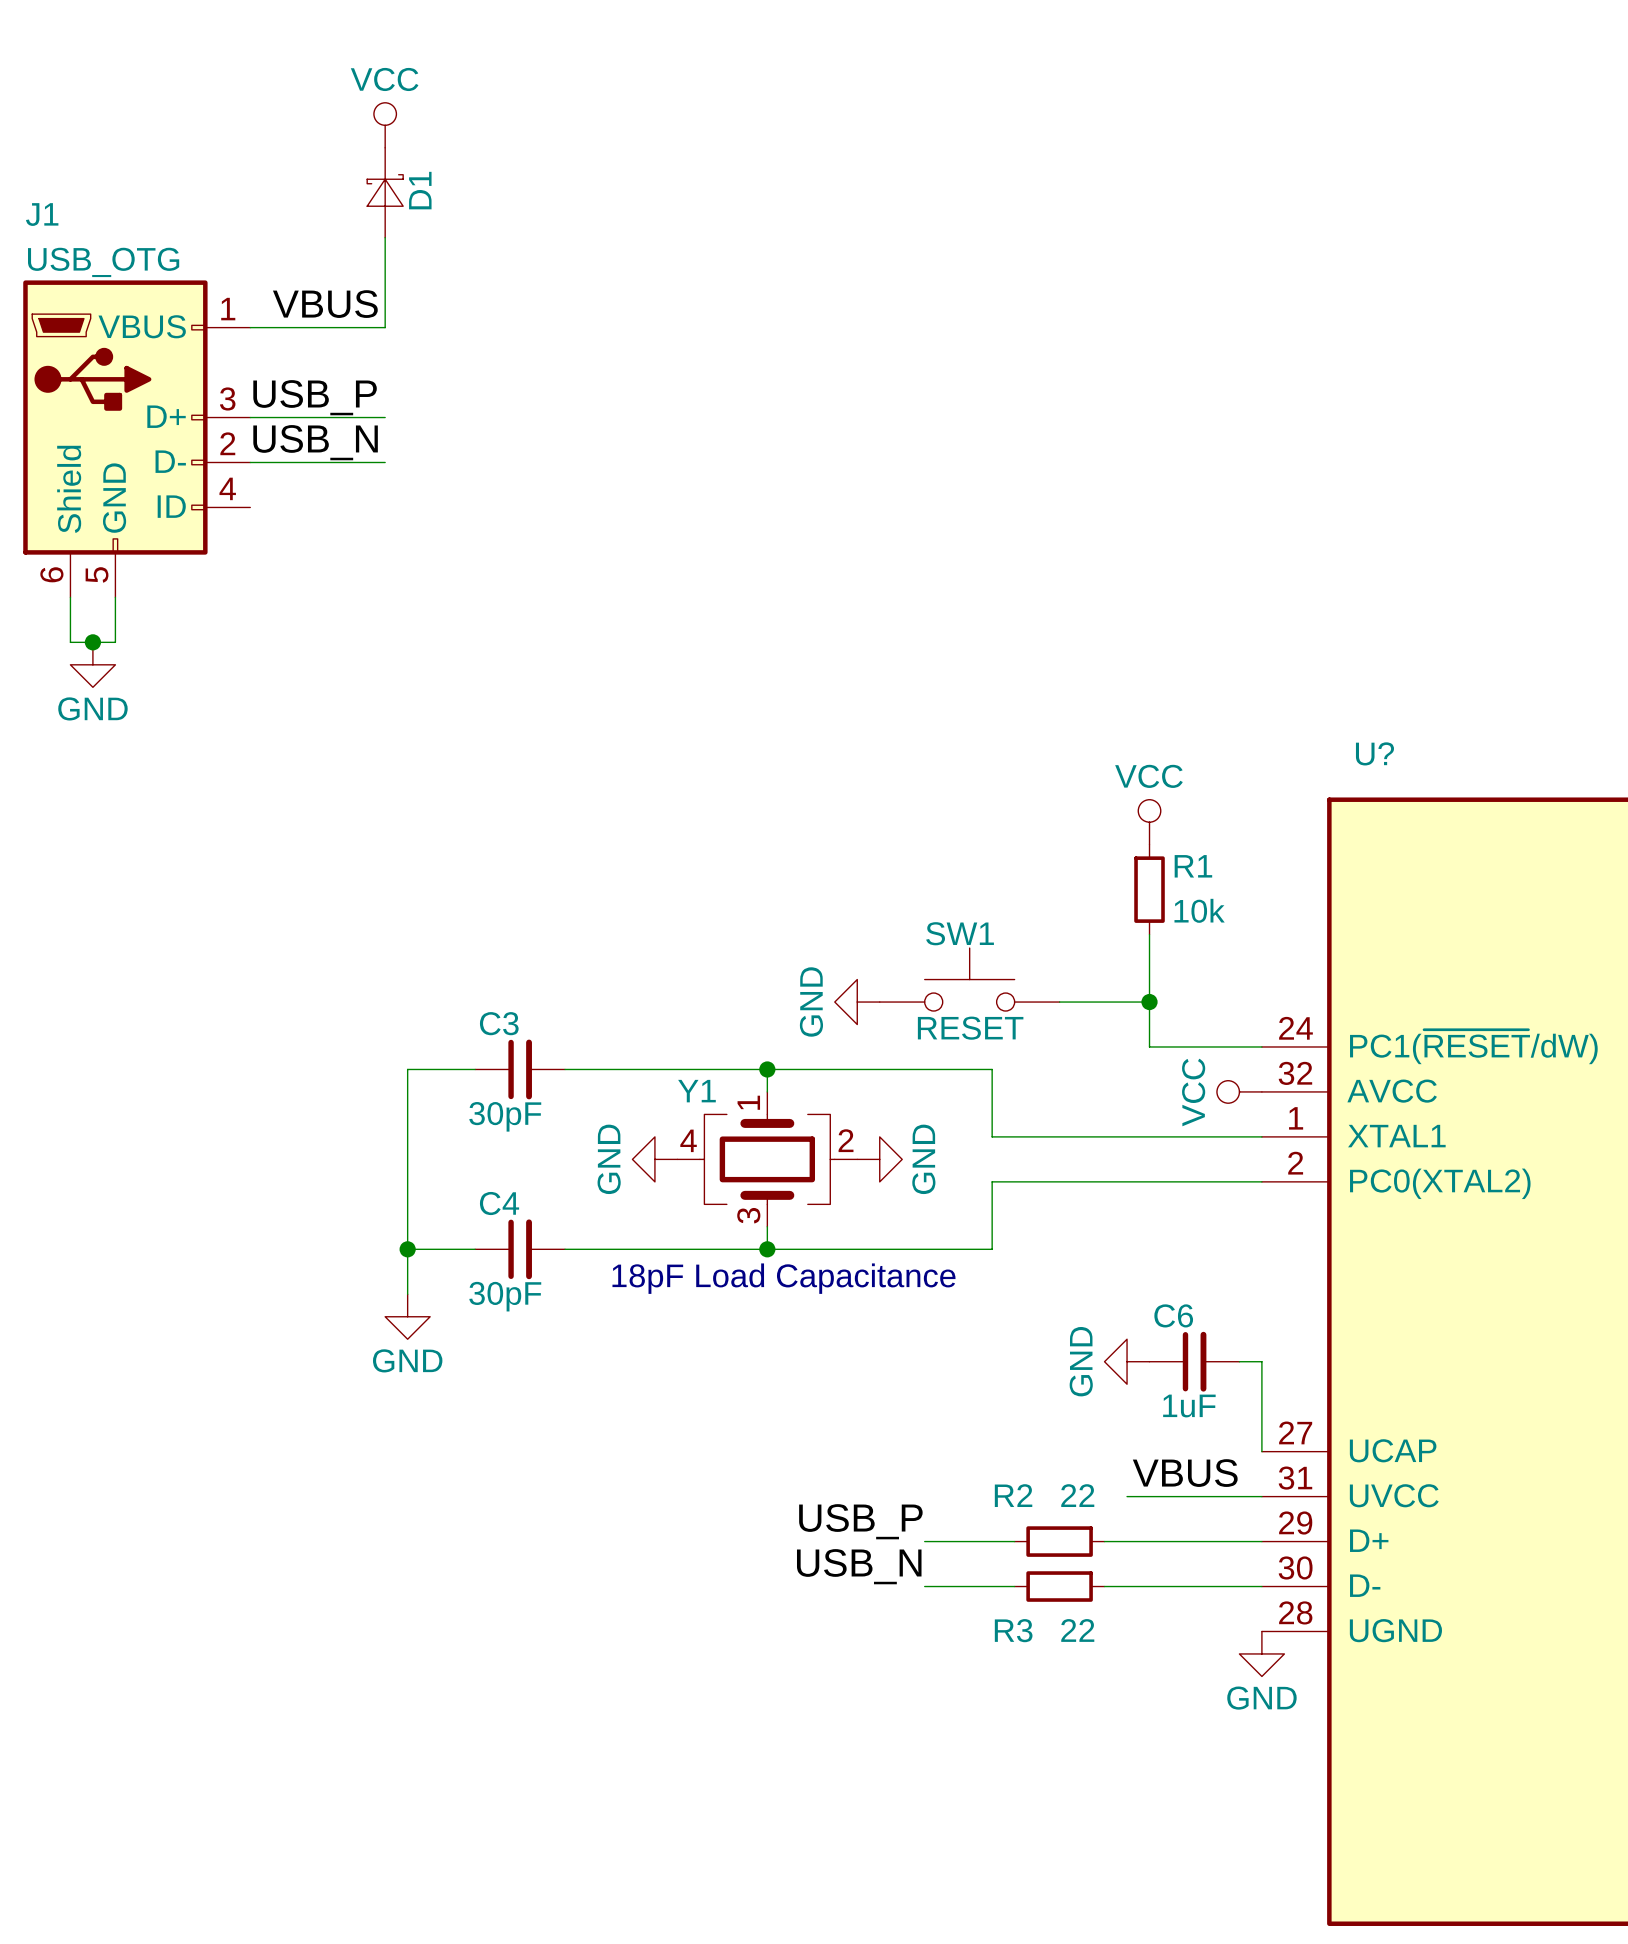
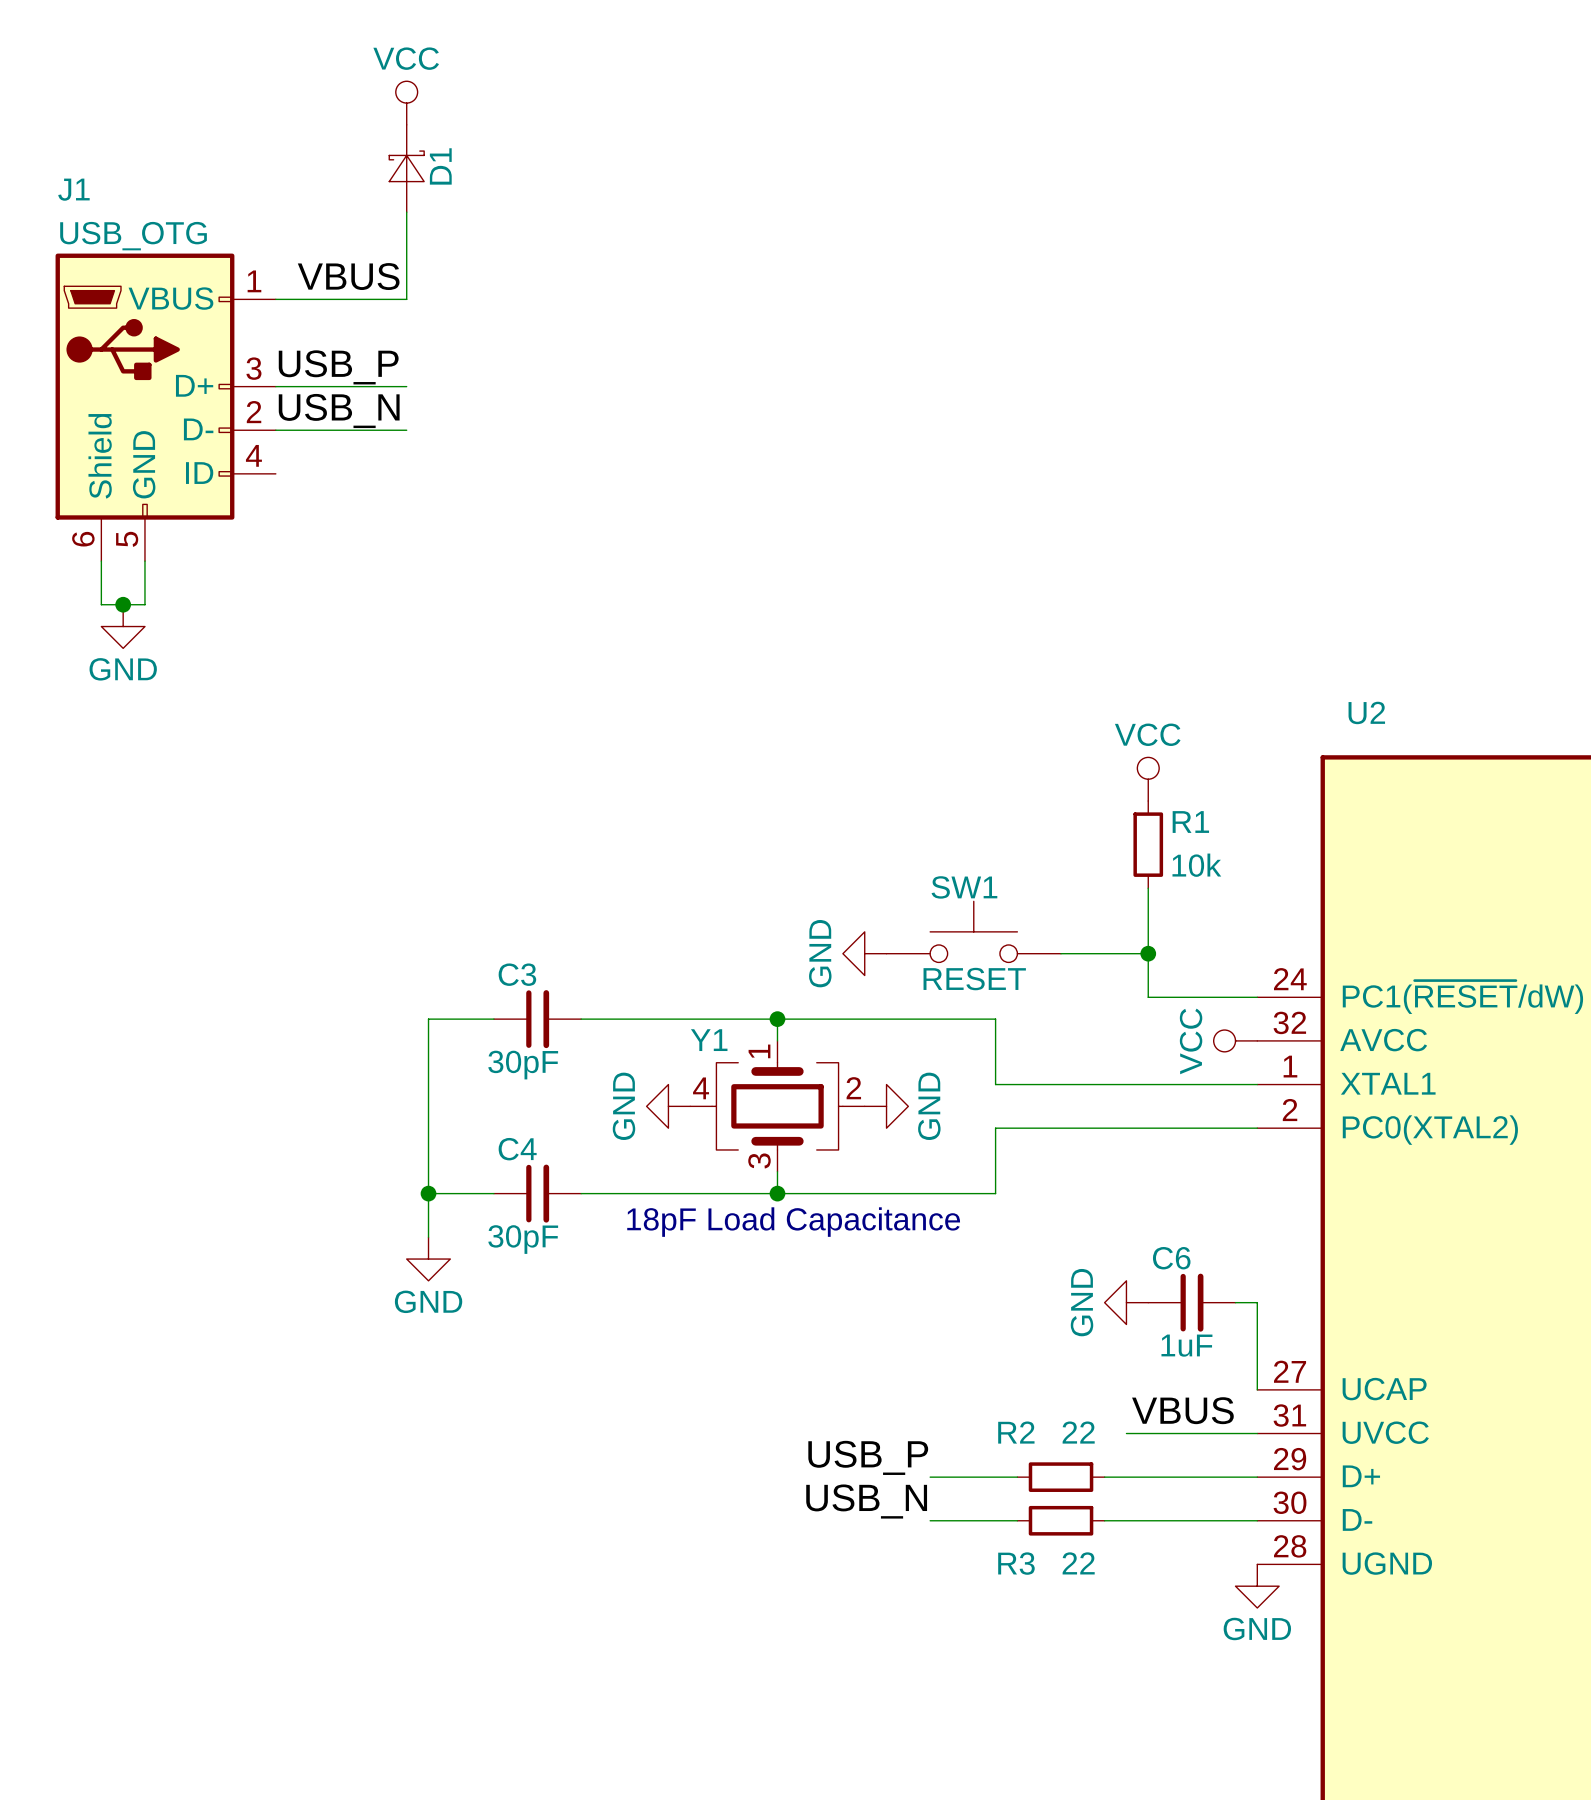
U? name: U? (1374, 753) -> U2 (1366, 712)

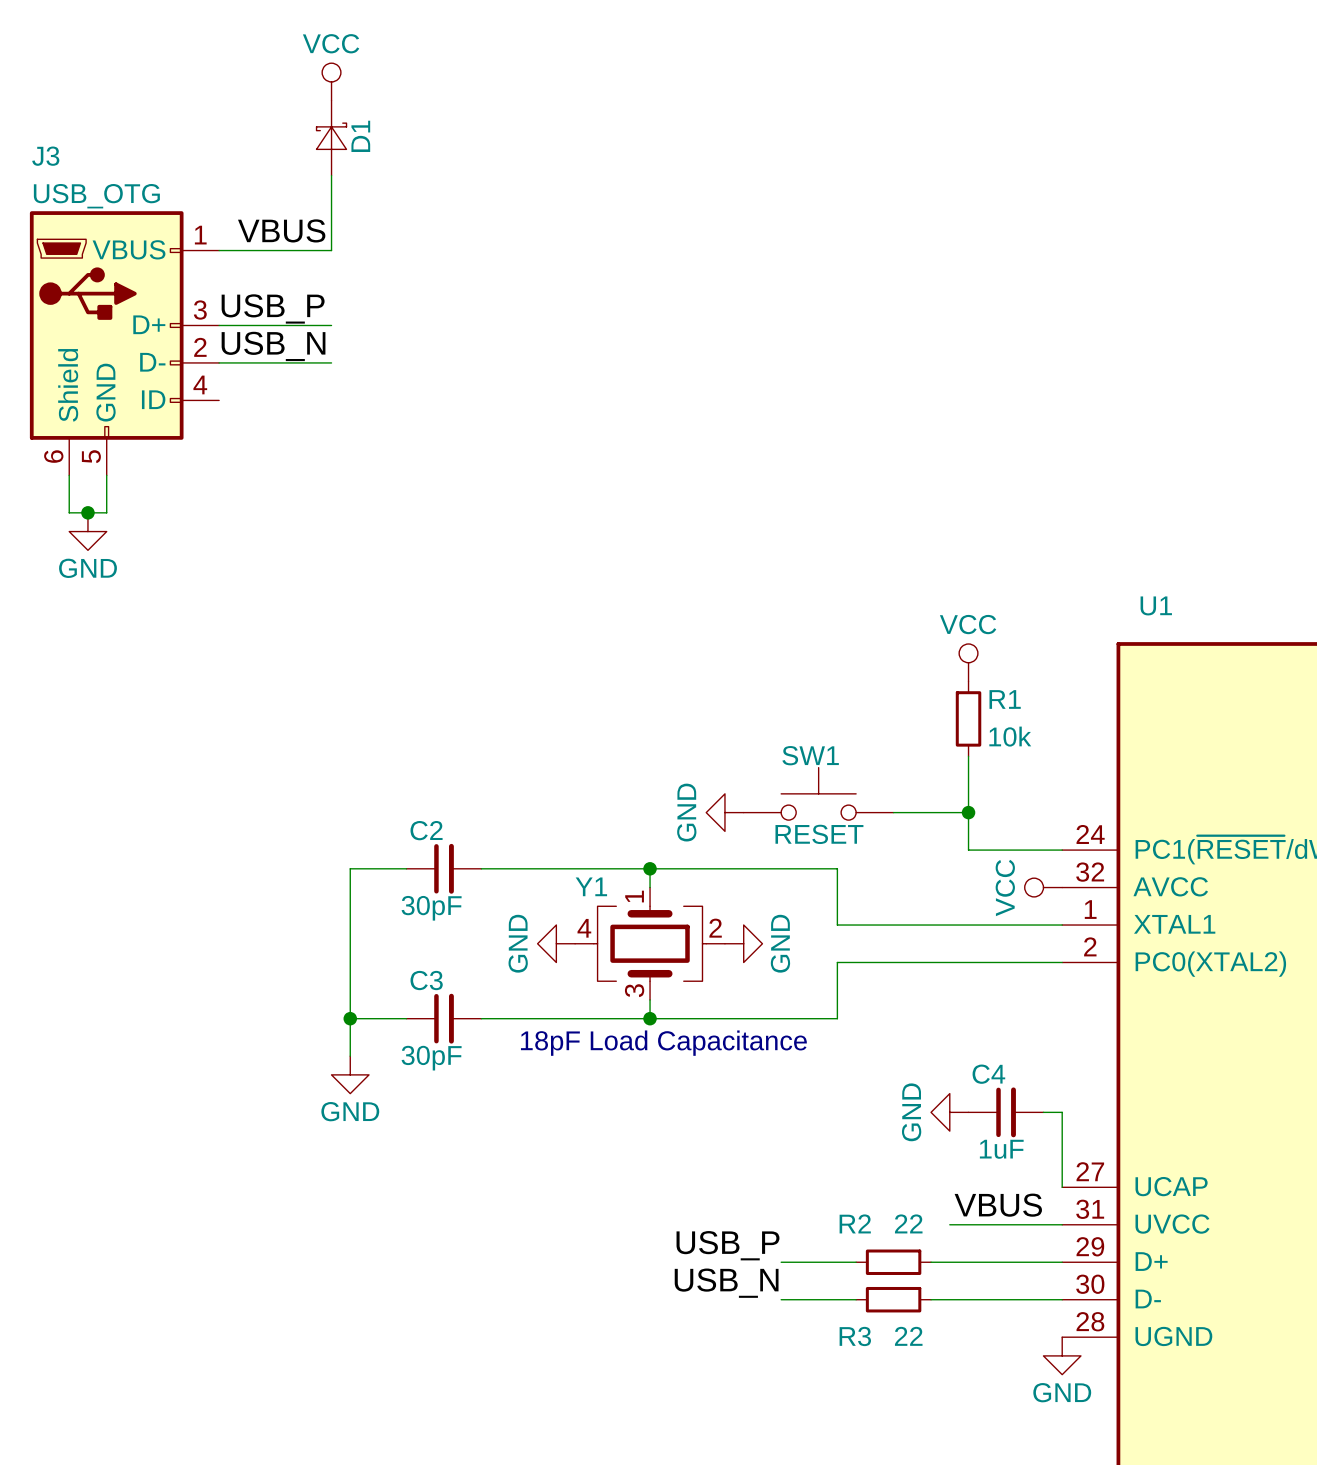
J1 name: J1 (73, 189) -> J3 (45, 156)
U2 name: U2 (1366, 712) -> U1 (1156, 605)
C3 name: C3 (517, 974) -> C2 (426, 830)
C4 name: C4 (517, 1149) -> C3 (426, 980)
C6 name: C6 (1171, 1258) -> C4 (988, 1074)

